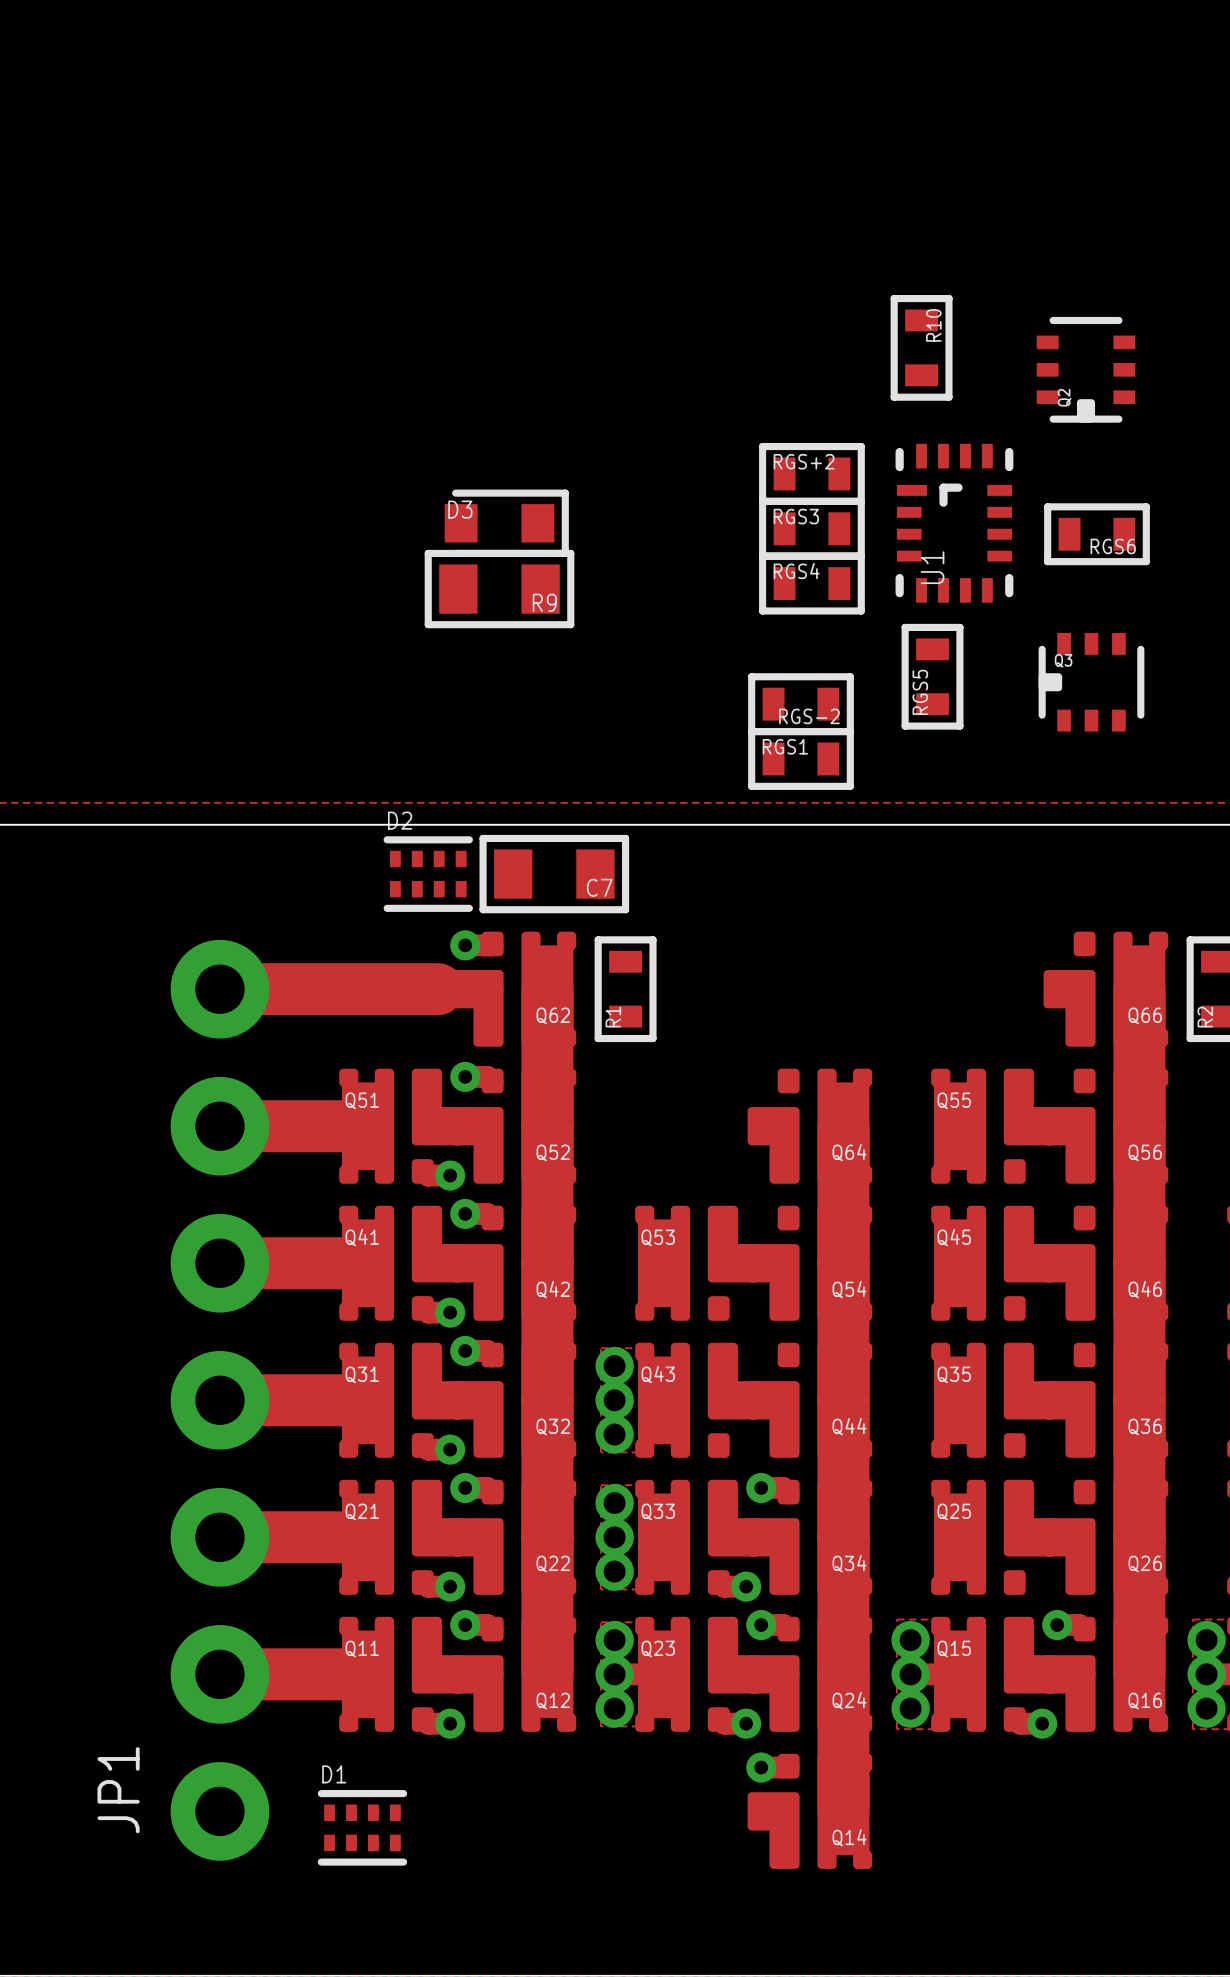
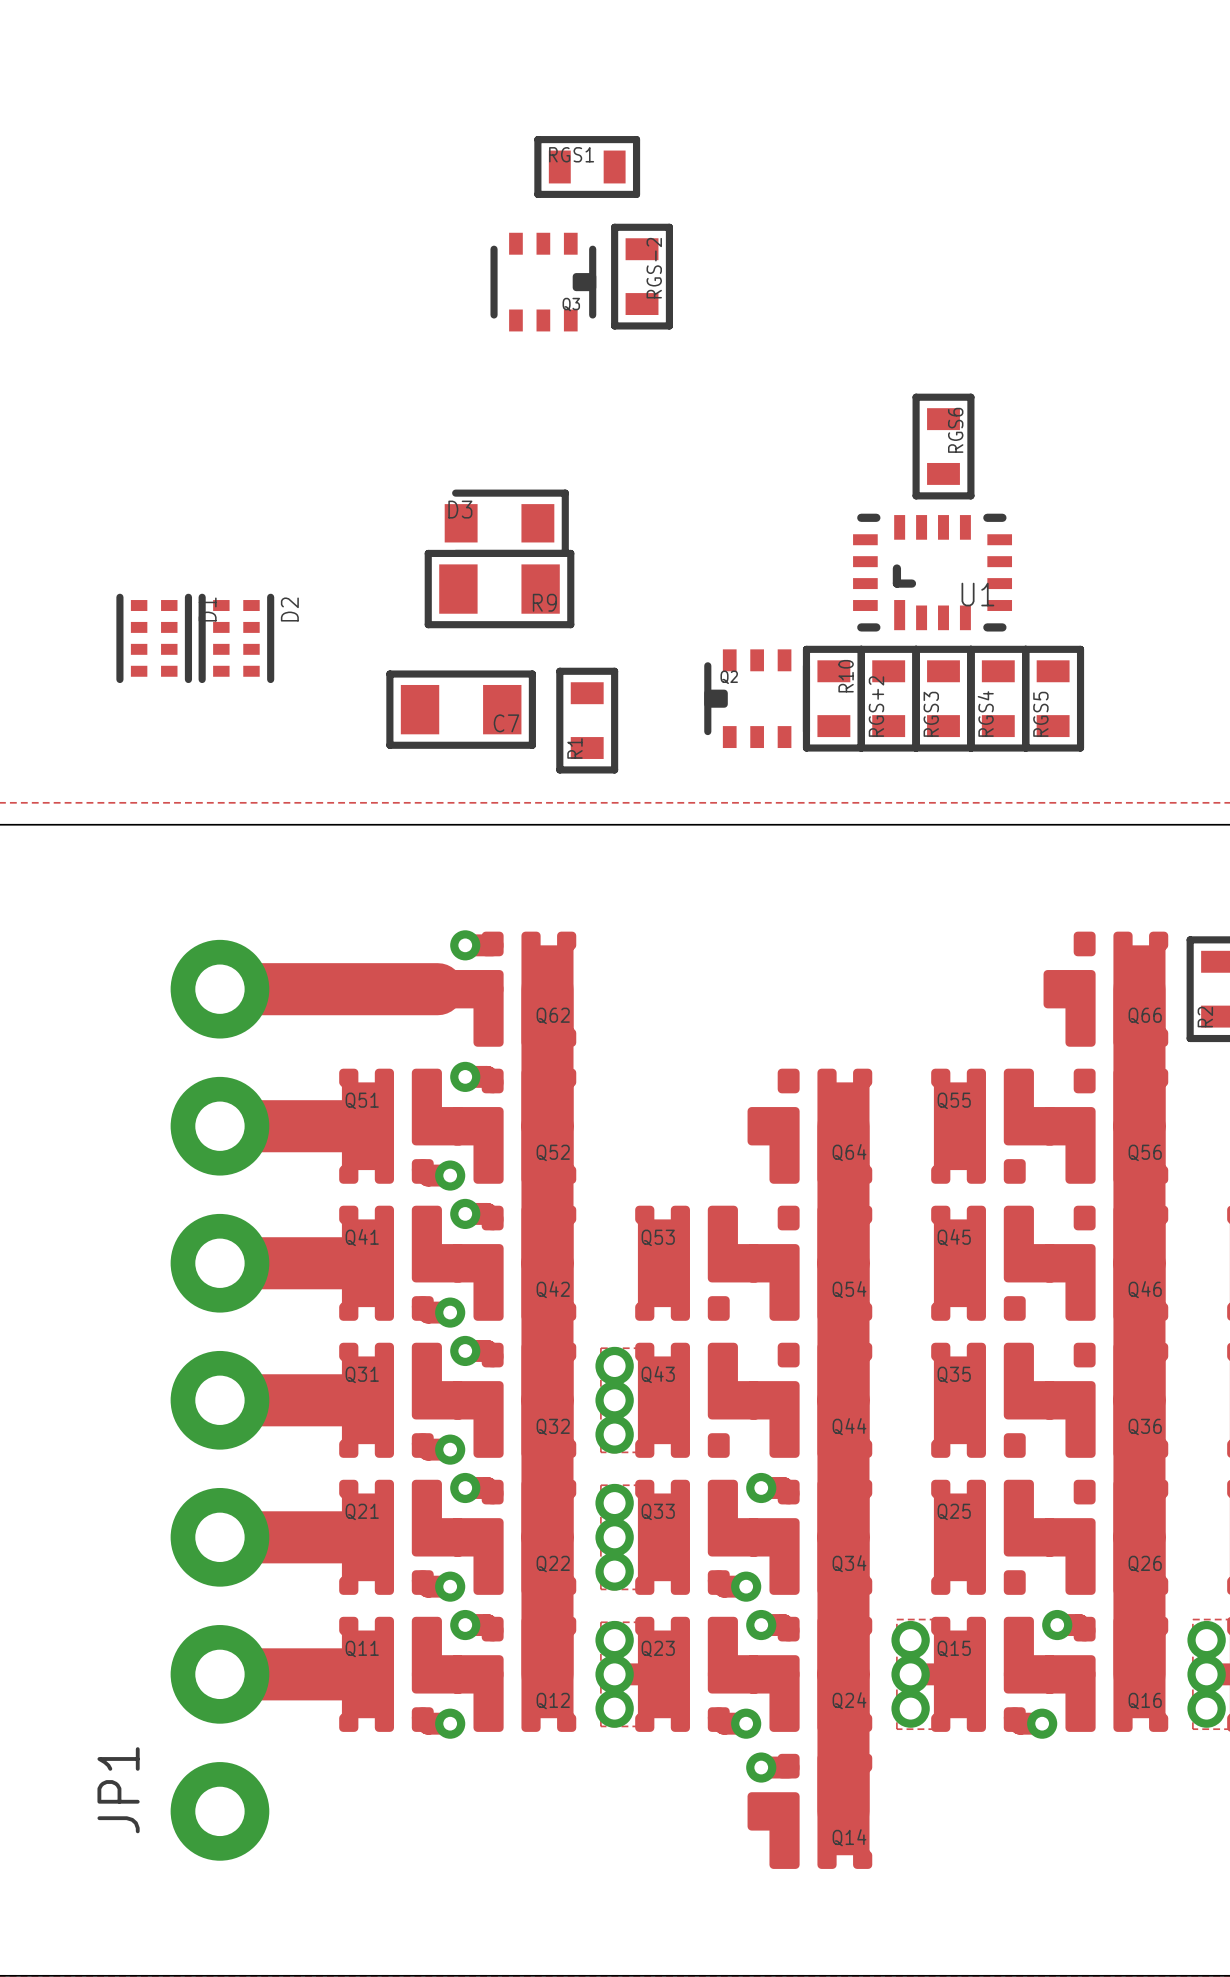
R10 position: (921, 347) -> (833, 698)
Q2 rotation: 0° (1086, 369) -> 90° clockwise (757, 698)
Q2 position: (1086, 369) -> (757, 698)
RGS+2 rotation: 0° (811, 473) -> 90° clockwise (888, 698)
RGS+2 position: (811, 473) -> (888, 698)
U1 rotation: 0° (954, 523) -> 90° counterclockwise (932, 572)
RGS3 rotation: 0° (811, 528) -> 90° clockwise (943, 698)
RGS3 position: (811, 528) -> (943, 698)
RGS6 rotation: 0° (1096, 534) -> 90° clockwise (943, 446)
RGS6 position: (1096, 534) -> (943, 446)
RGS4 rotation: 0° (811, 583) -> 90° clockwise (998, 698)
RGS4 position: (811, 583) -> (998, 698)
RGS5 position: (932, 676) -> (1053, 698)
Q3 rotation: 0° (1091, 682) -> 180° (543, 282)
Q3 position: (1091, 682) -> (543, 282)
RGS-2 rotation: 0° (800, 704) -> 90° clockwise (642, 276)
RGS-2 position: (800, 704) -> (642, 276)
RGS1 position: (800, 758) -> (587, 166)
D2 rotation: 0° (428, 874) -> 90° clockwise (236, 638)
D2 position: (428, 874) -> (236, 638)
C7 position: (554, 874) -> (461, 709)
R1 position: (625, 989) -> (587, 720)
D1 rotation: 0° (362, 1827) -> 90° clockwise (154, 638)
D1 position: (362, 1827) -> (154, 638)

